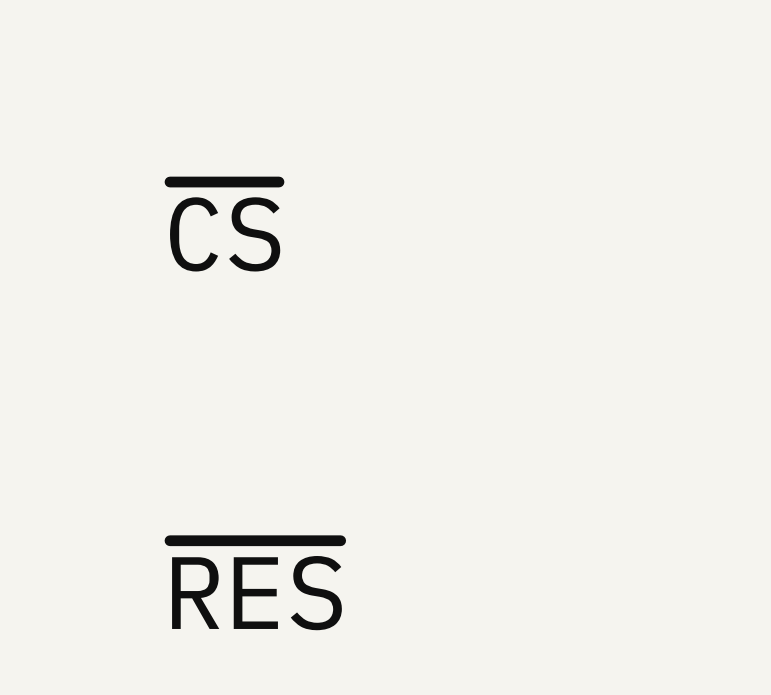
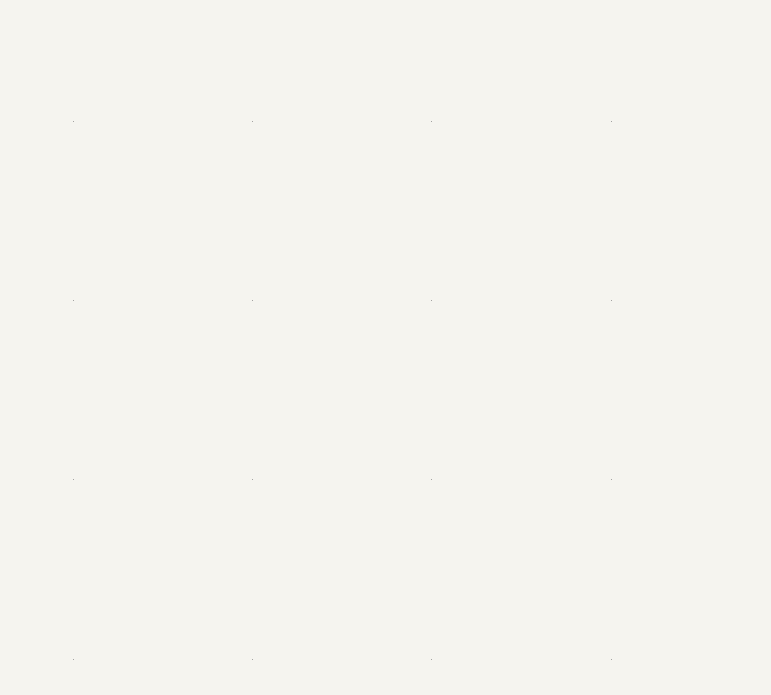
label: ~{CS} (225, 226) -> none
label: ~{RES} (255, 585) -> none

